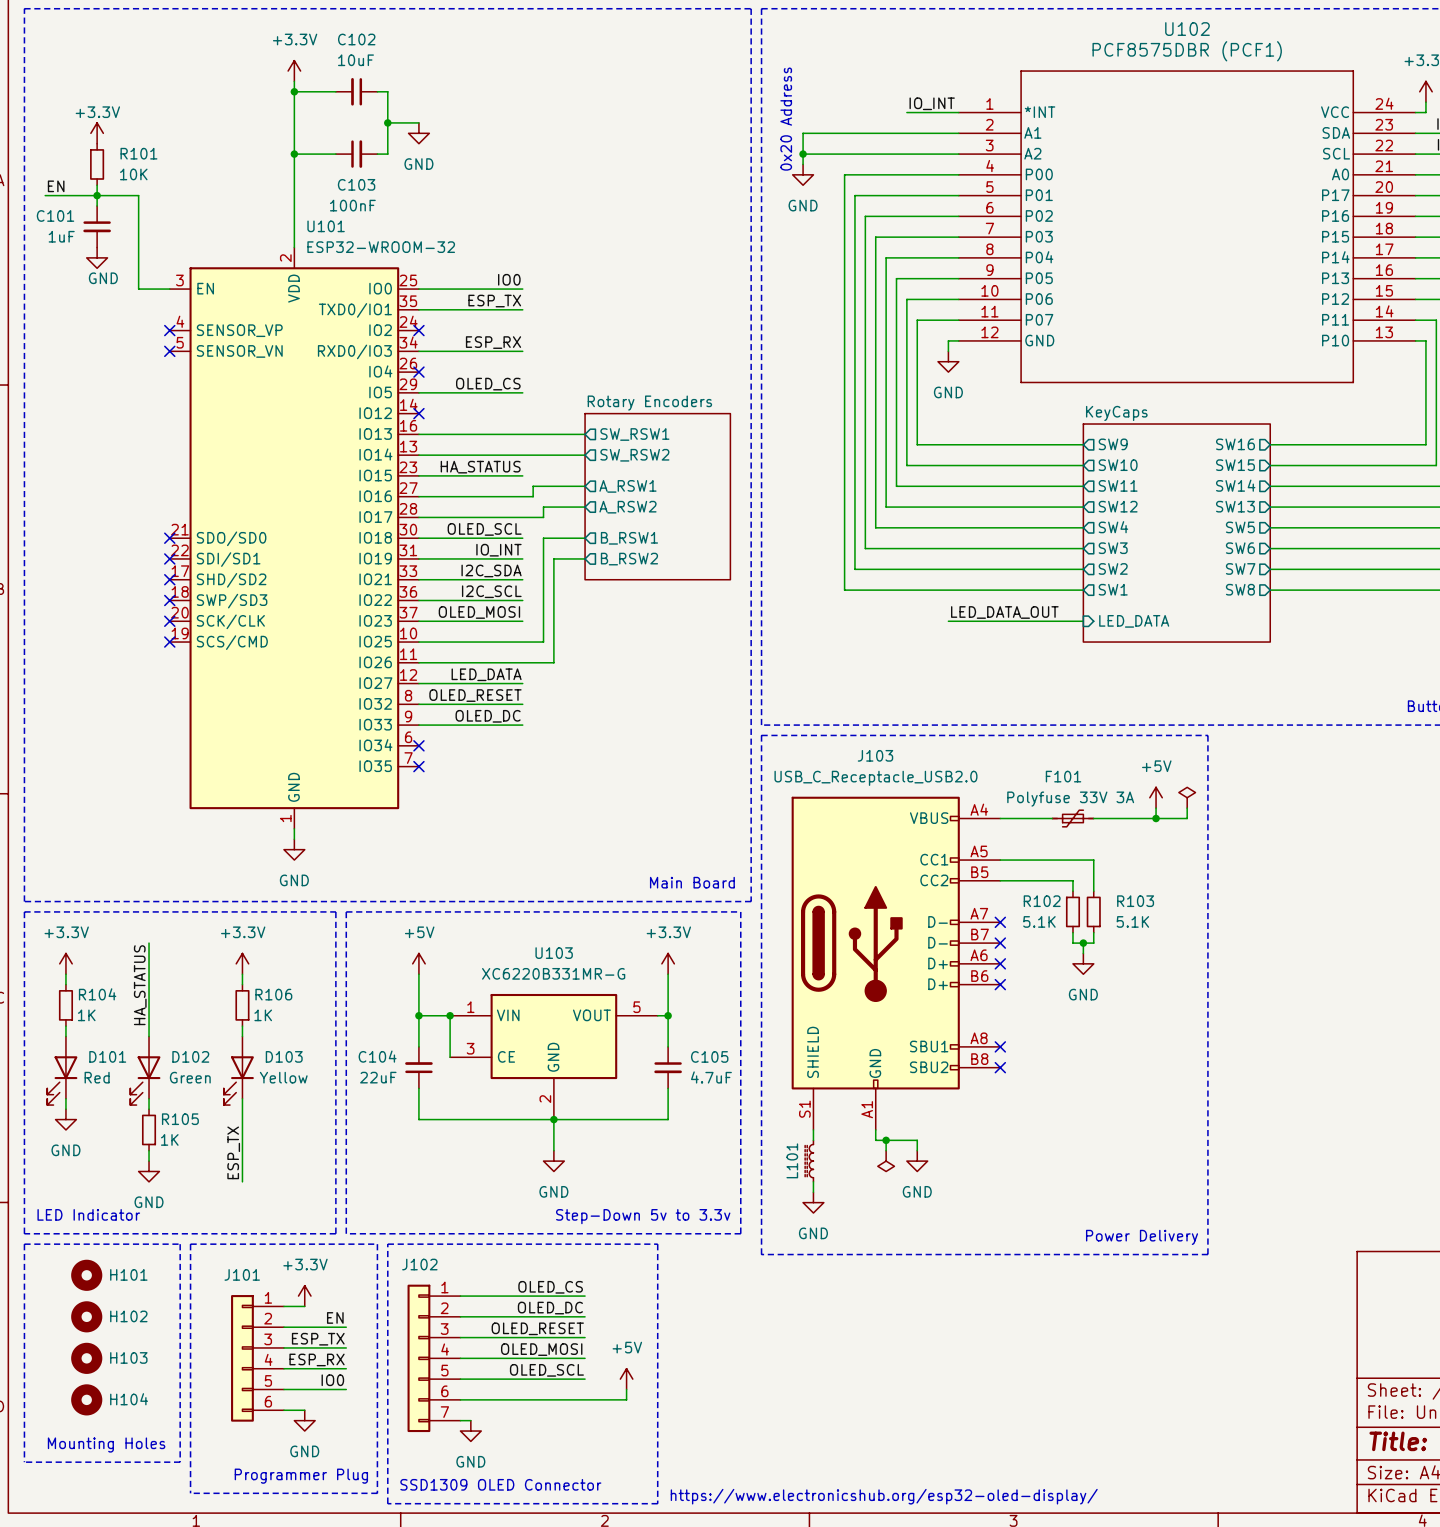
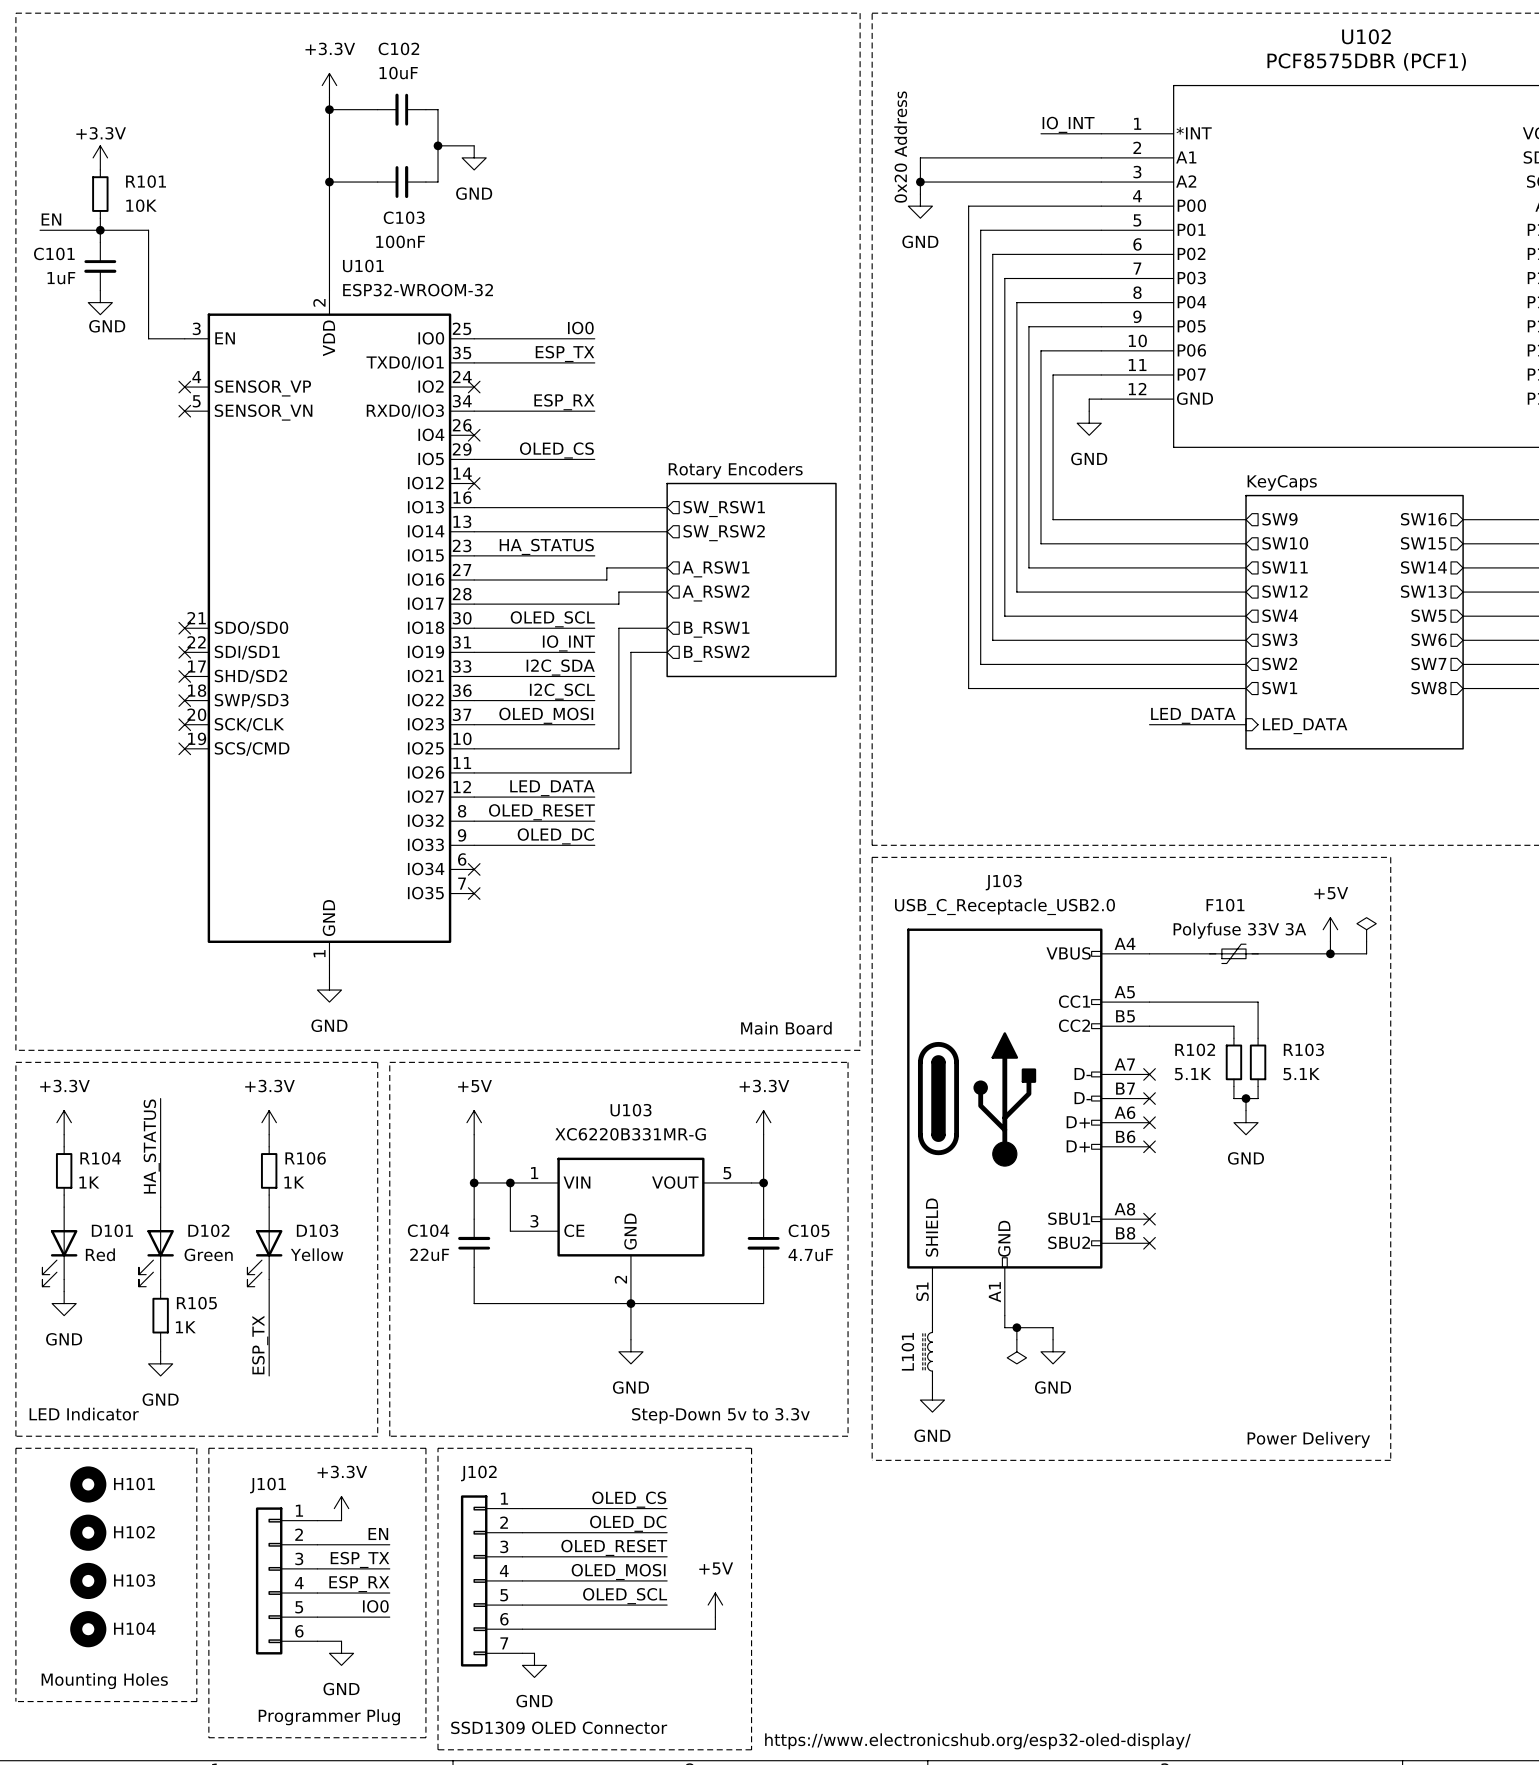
label: LED_DATA_OUT (1004, 612) -> LED_DATA (1193, 715)
wire: (948, 621) (1000, 621) -> none

